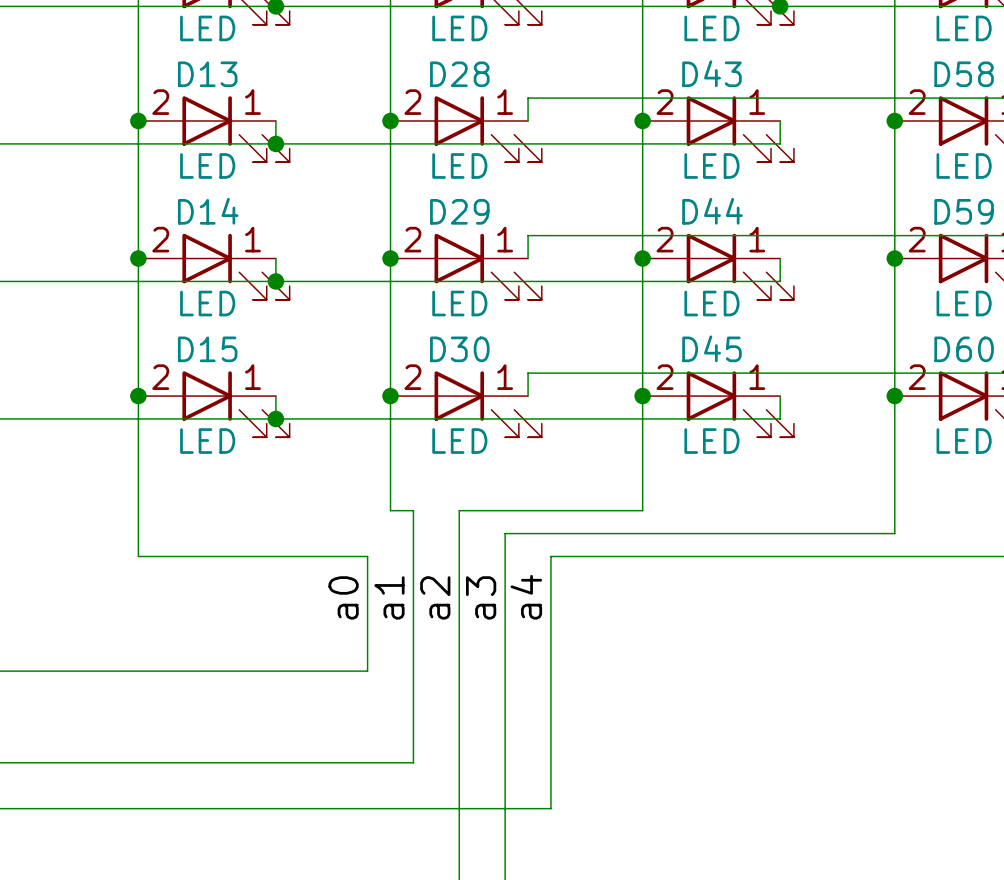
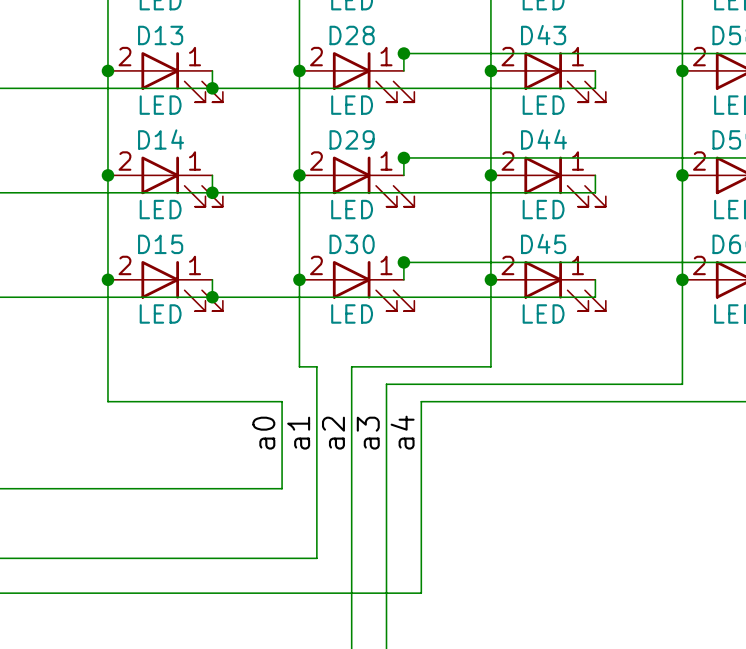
junction: none -> (403, 53)
junction: none -> (403, 157)
junction: none -> (403, 262)

